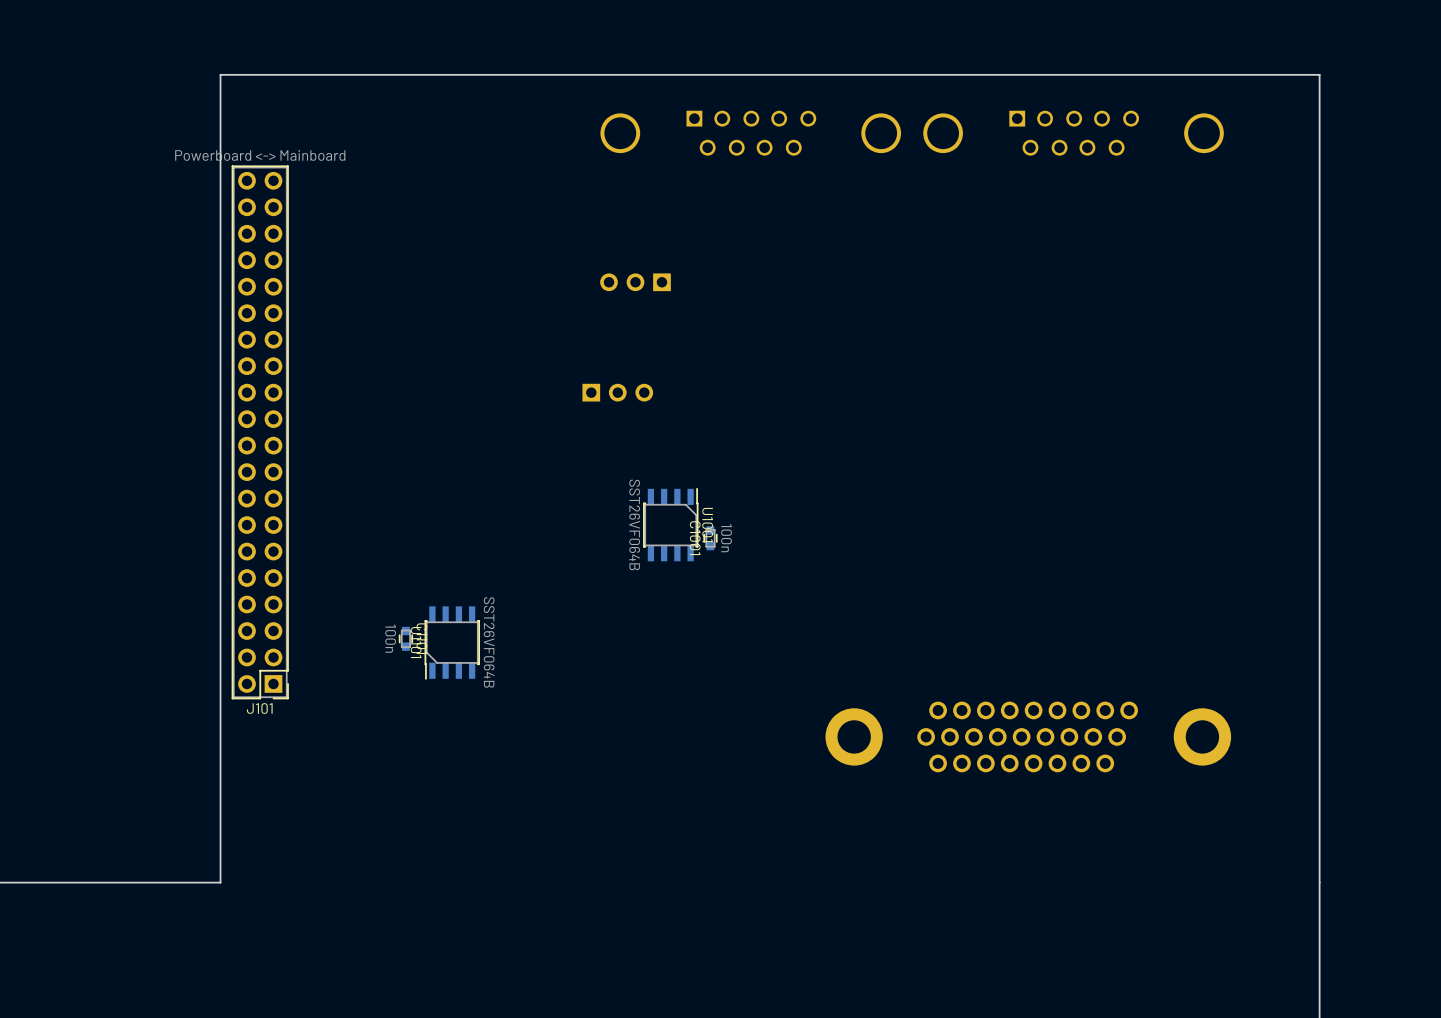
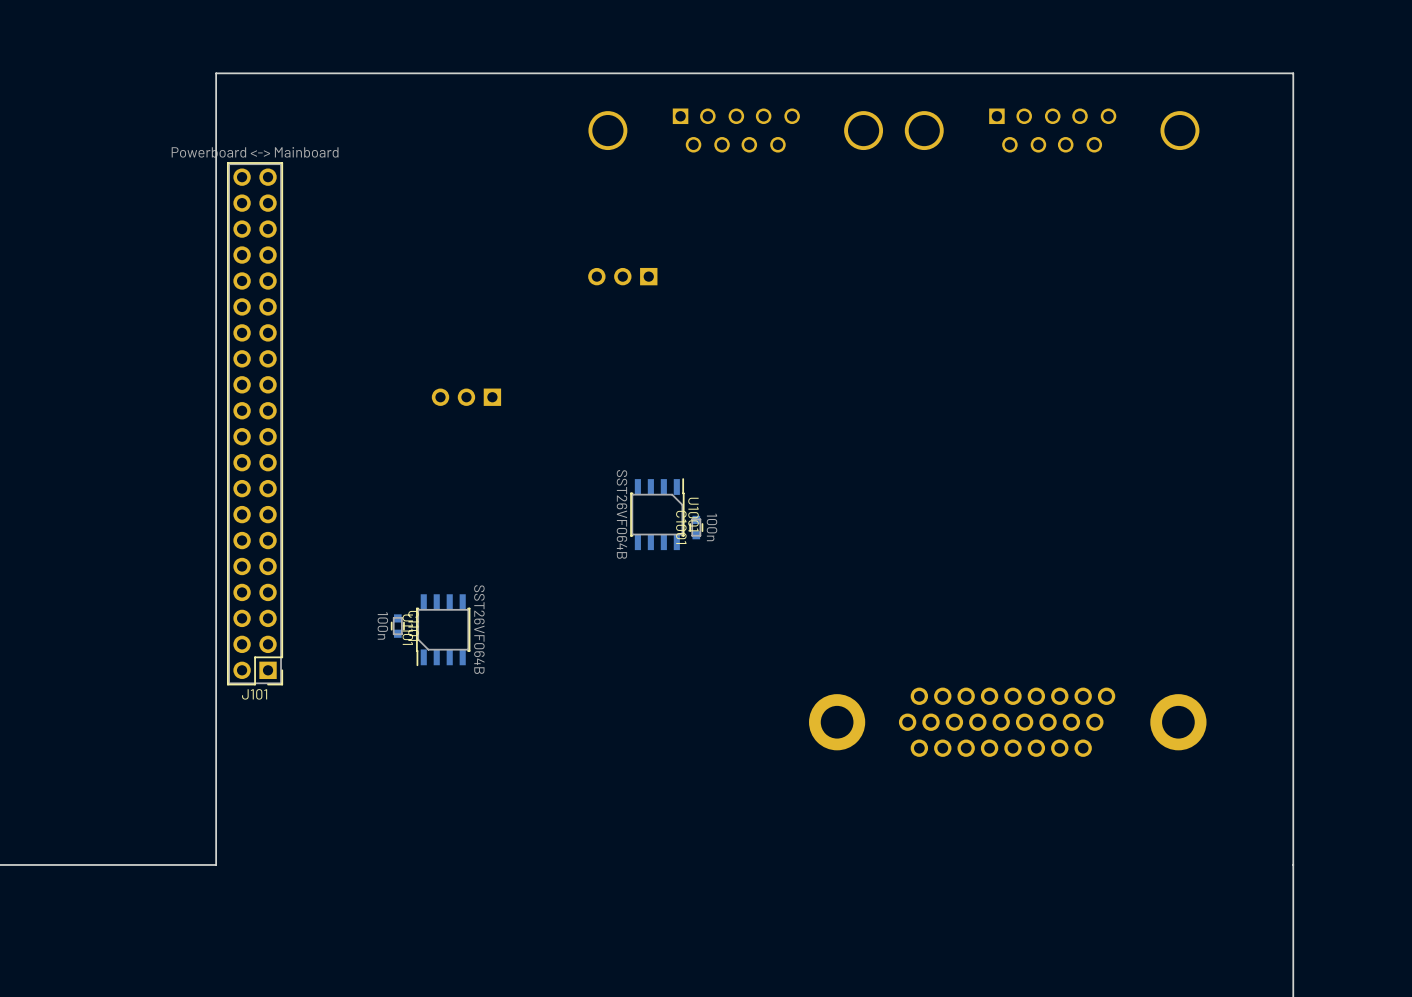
part rotation: 0° (617, 392) -> 180° (466, 397)
part position: (617, 392) -> (466, 397)

